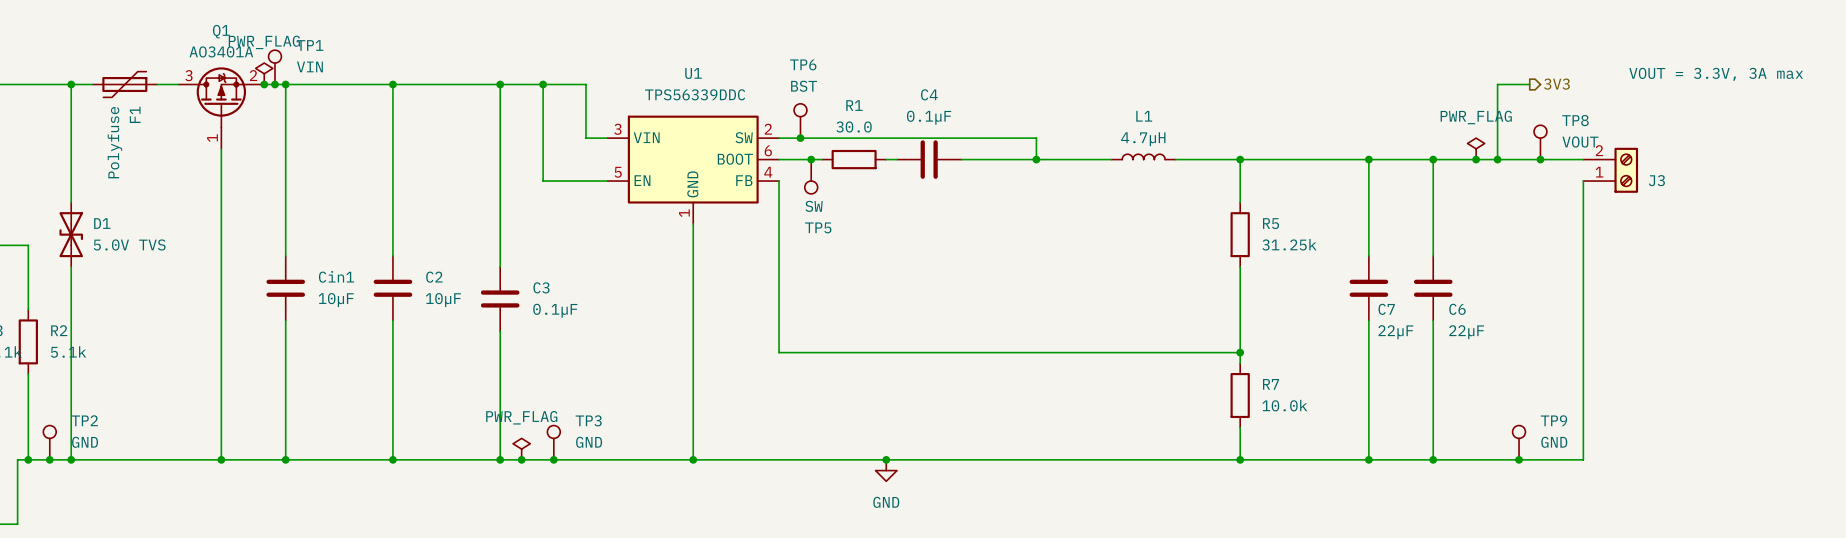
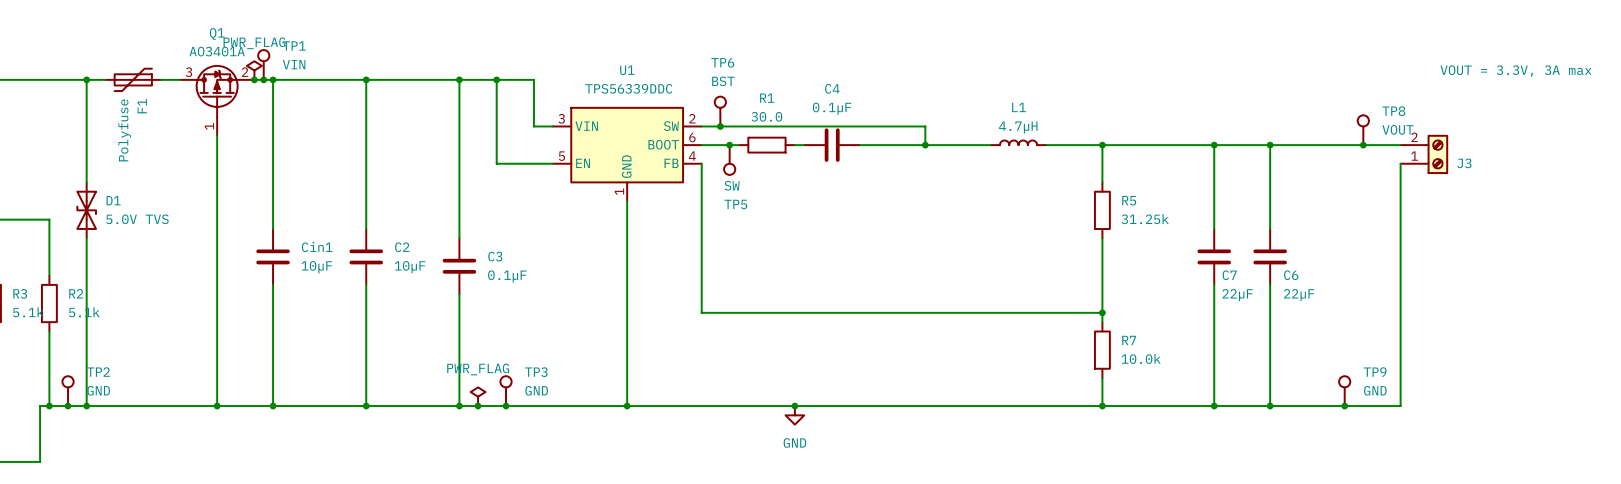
wire: (1529, 84) (1497, 84) (1497, 159) -> none
hierarchical label: 3V3 (1556, 84) -> none
power symbol: PWR_FLAG (1476, 148) -> none
junction: (1476, 159) -> none
junction: (1497, 159) -> none

